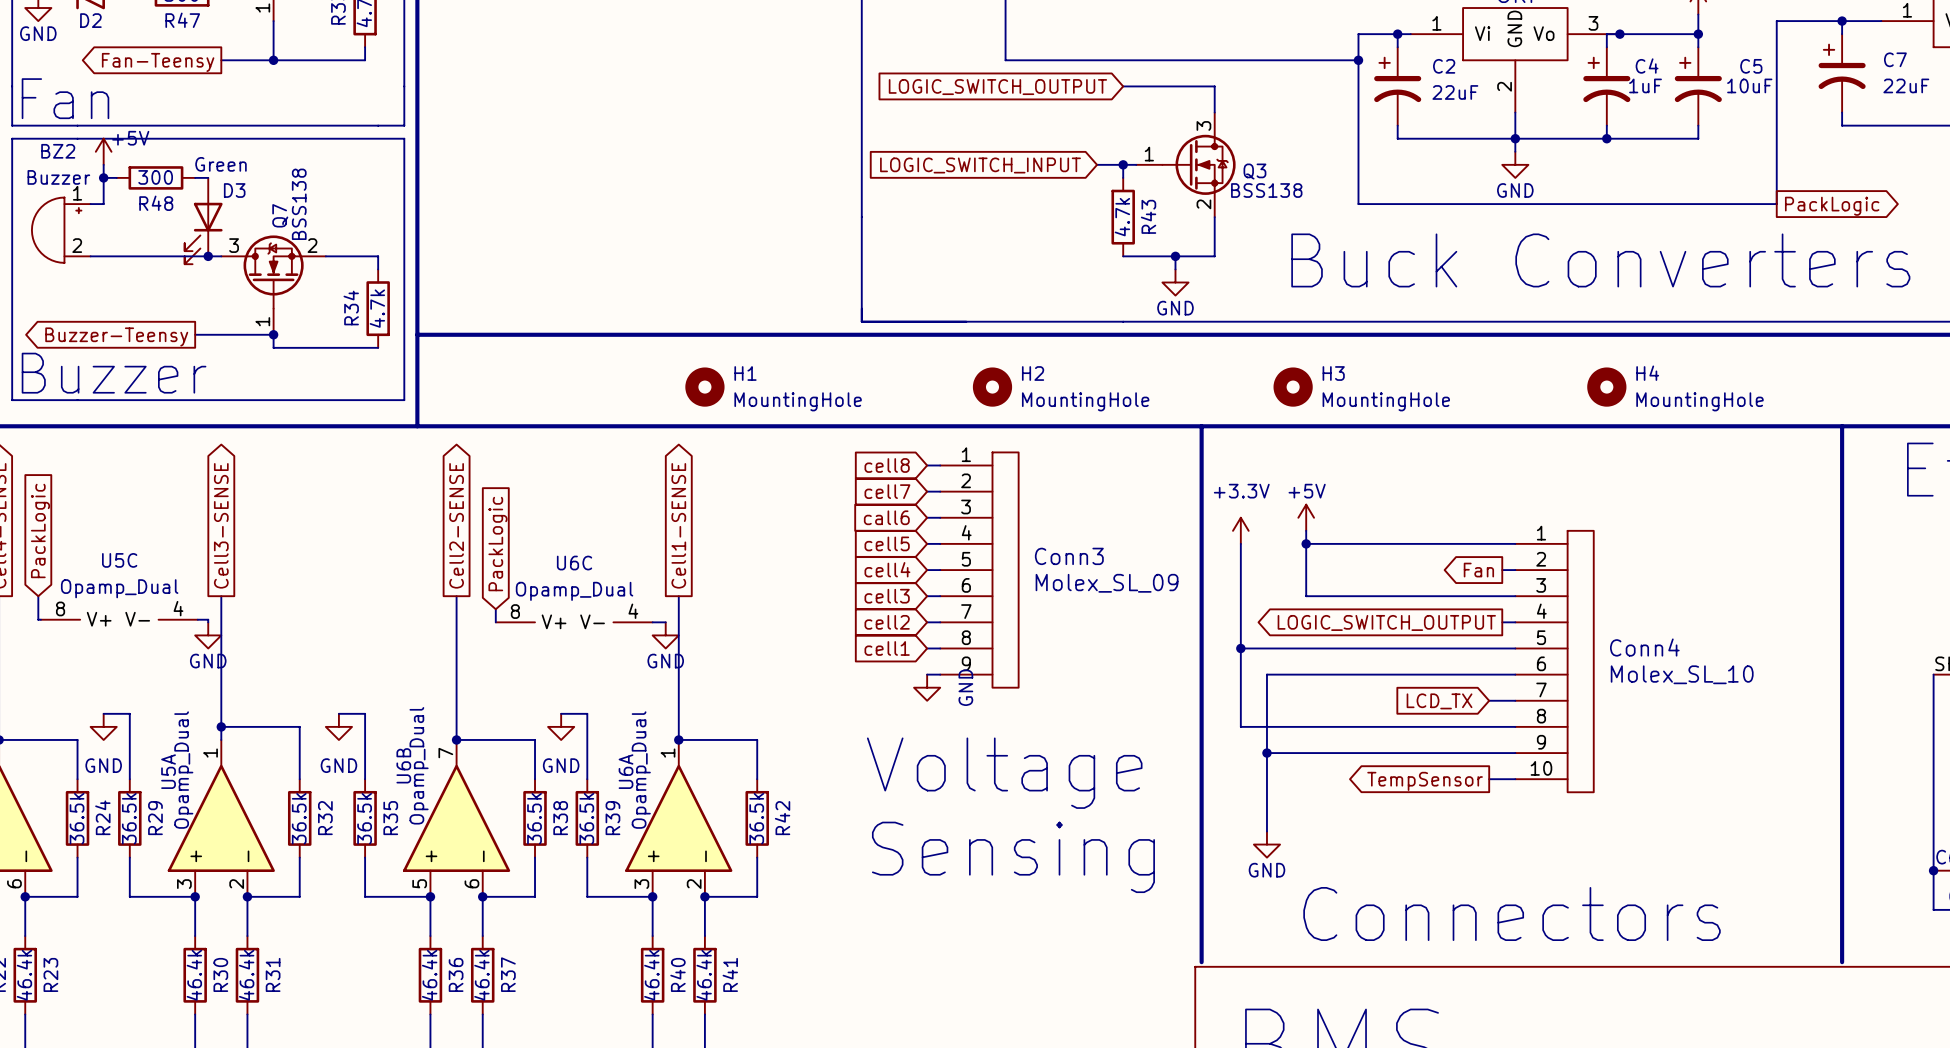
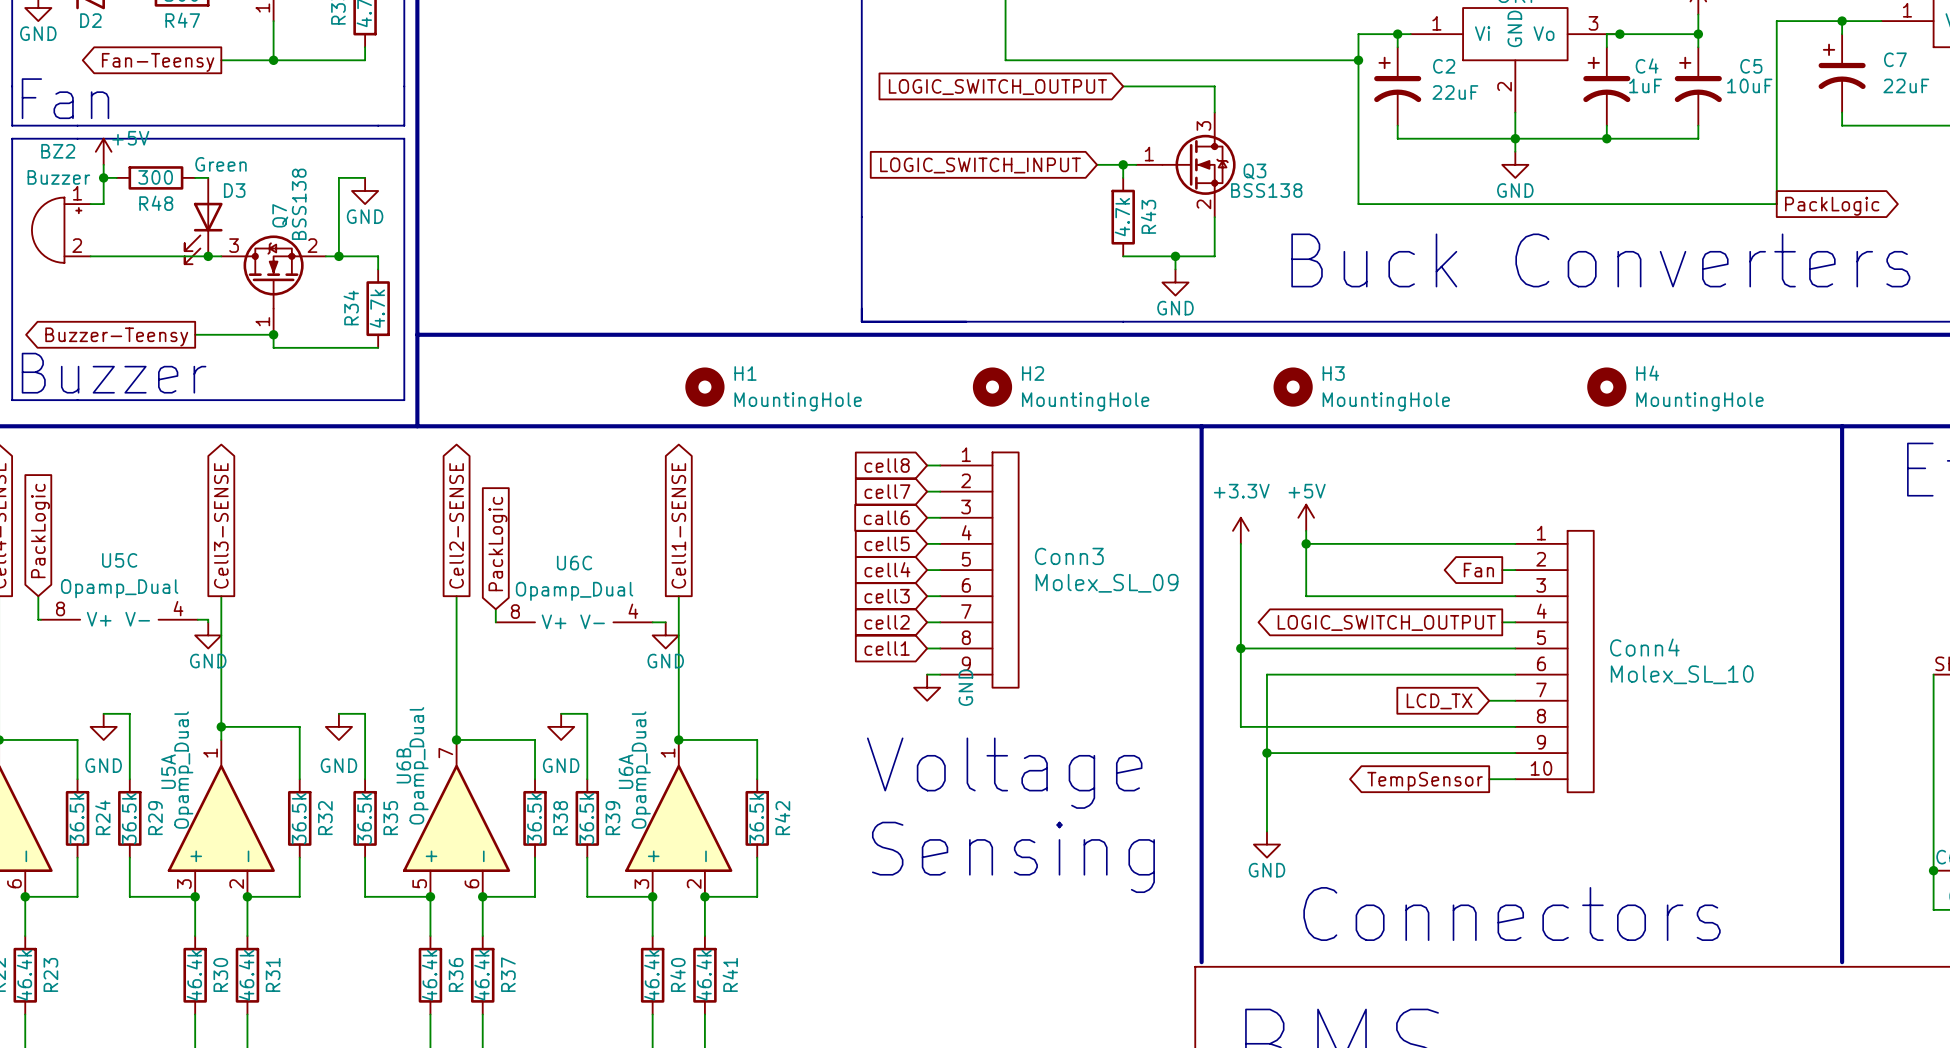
wire: none -> (365, 177) (338, 177) (338, 256)
power symbol: none -> GND (365, 191)
junction: none -> (338, 256)

